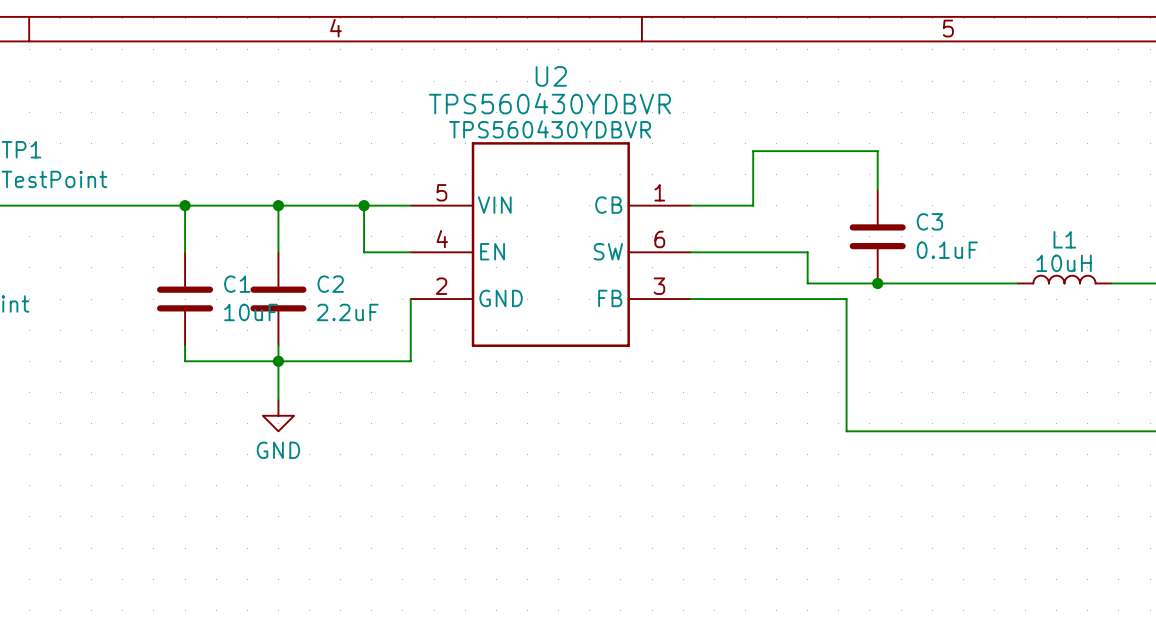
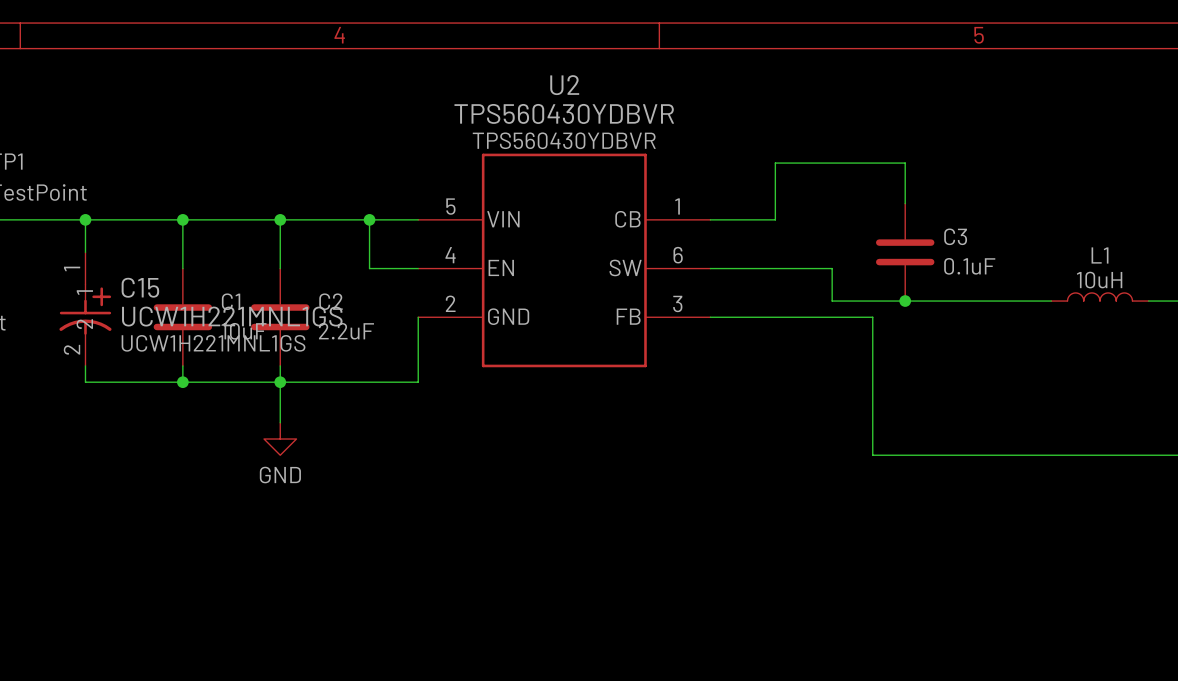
wire: none -> (85, 219) (85, 252)
junction: none -> (85, 219)
C15: none -> UCW1H221MNL1GS (85, 309)
wire: none -> (85, 365) (85, 382) (182, 382)
junction: none -> (182, 382)

